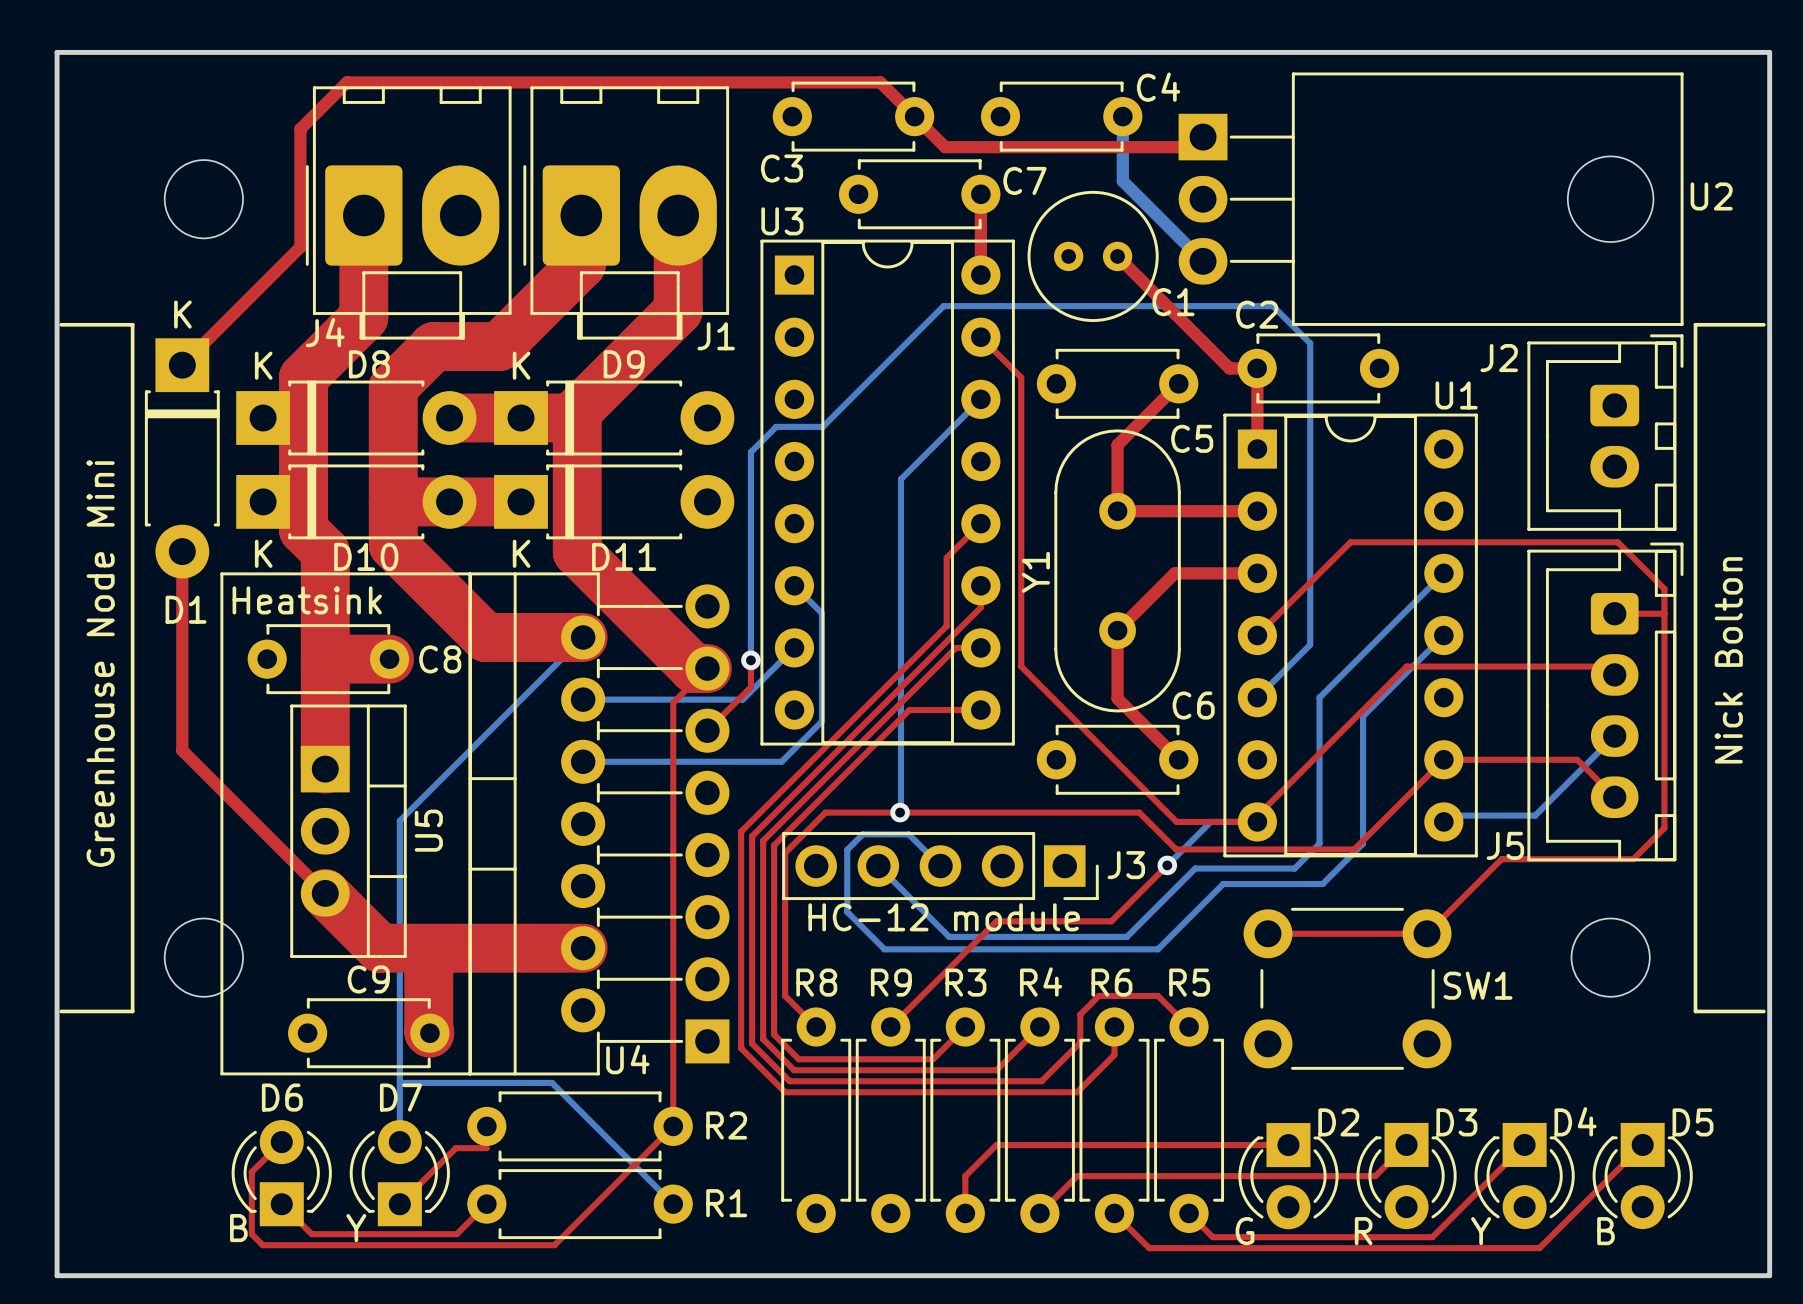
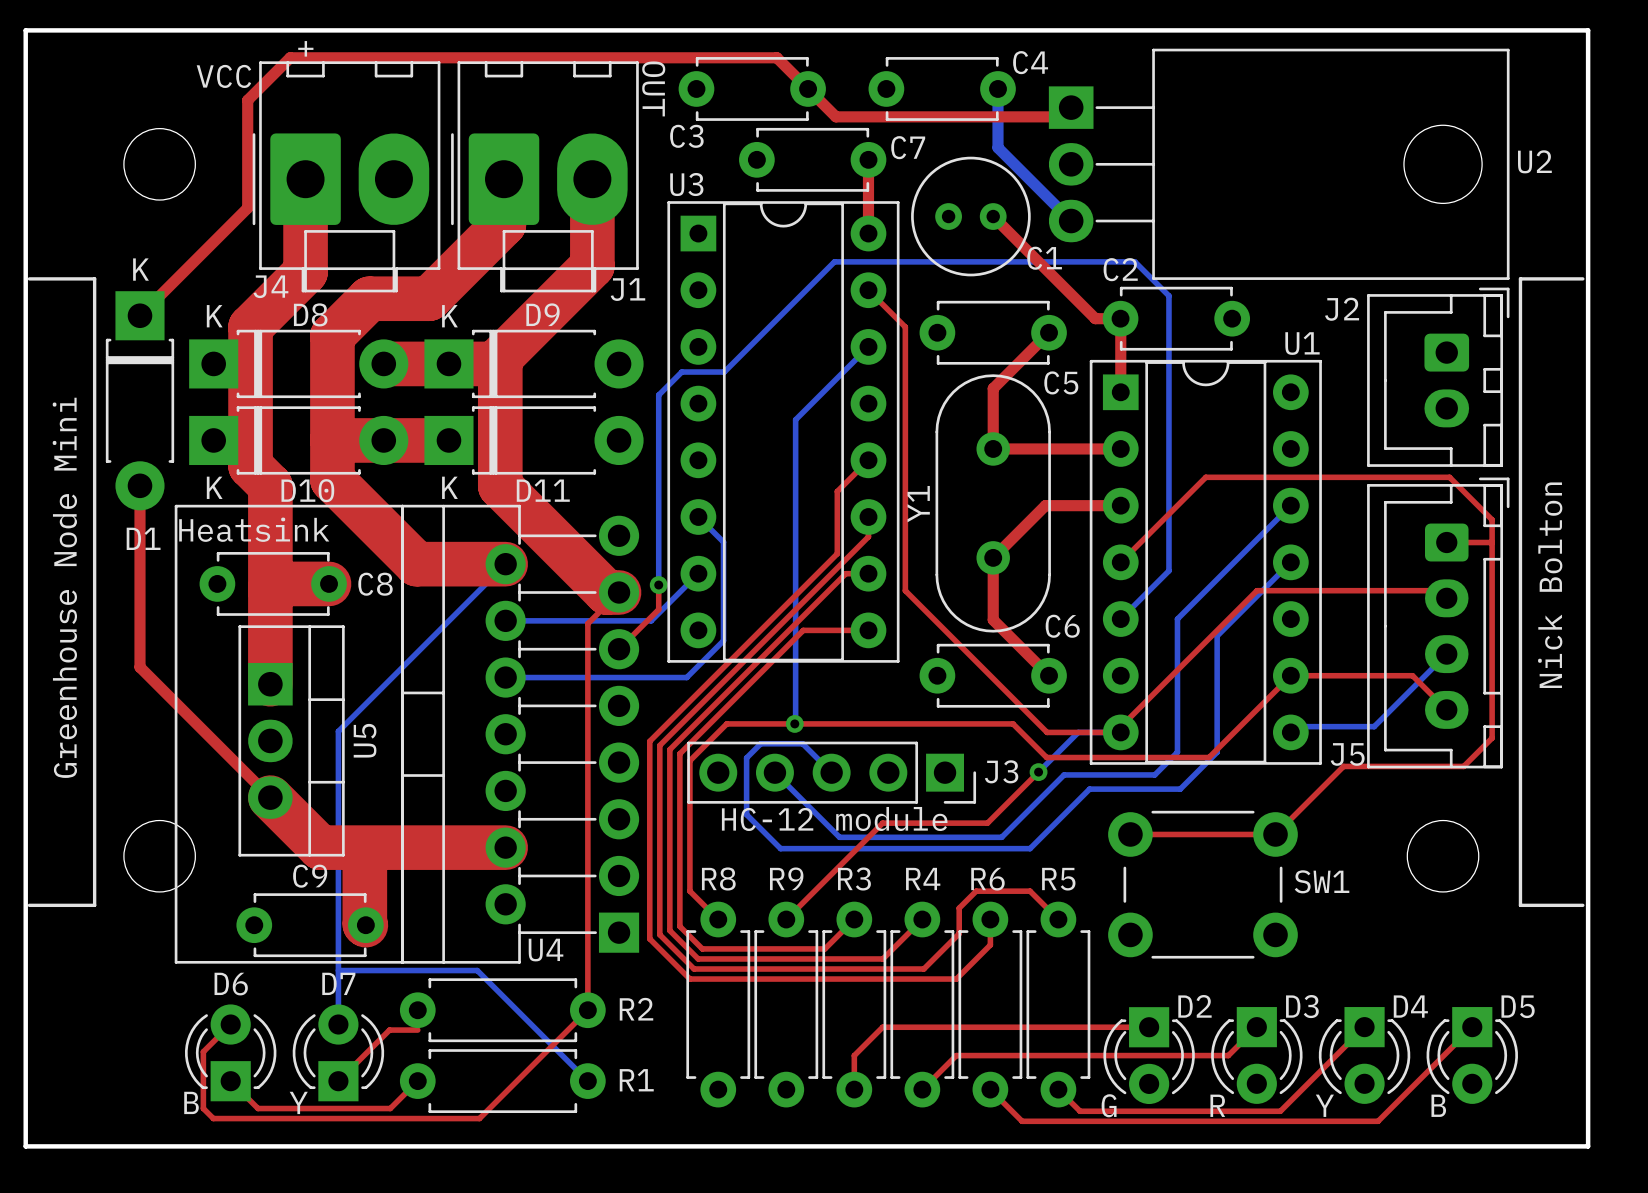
text: none -> + (305, 48)
text: none -> VCC (223, 76)
text: none -> OUT (653, 88)

